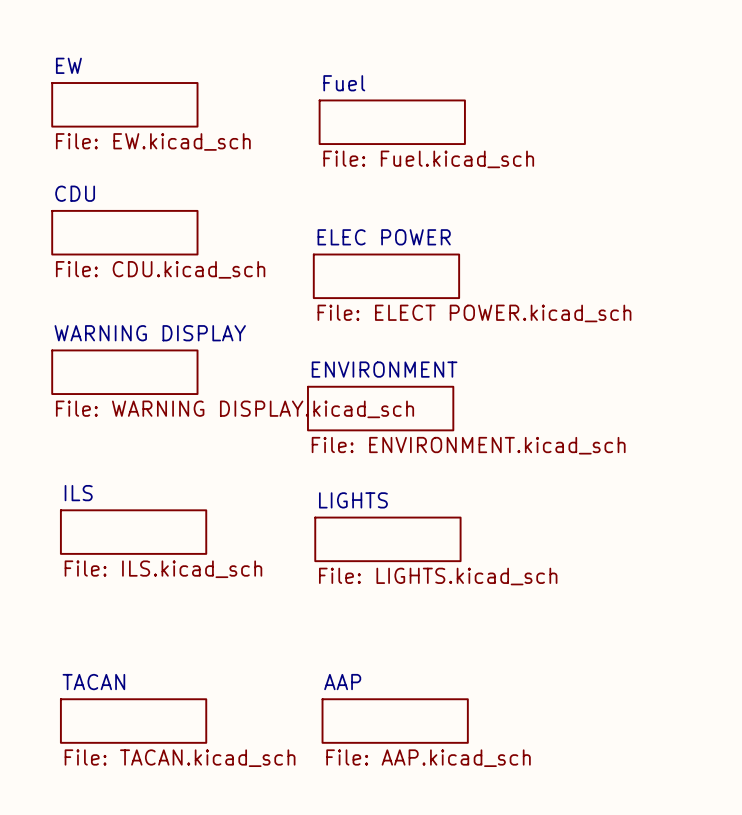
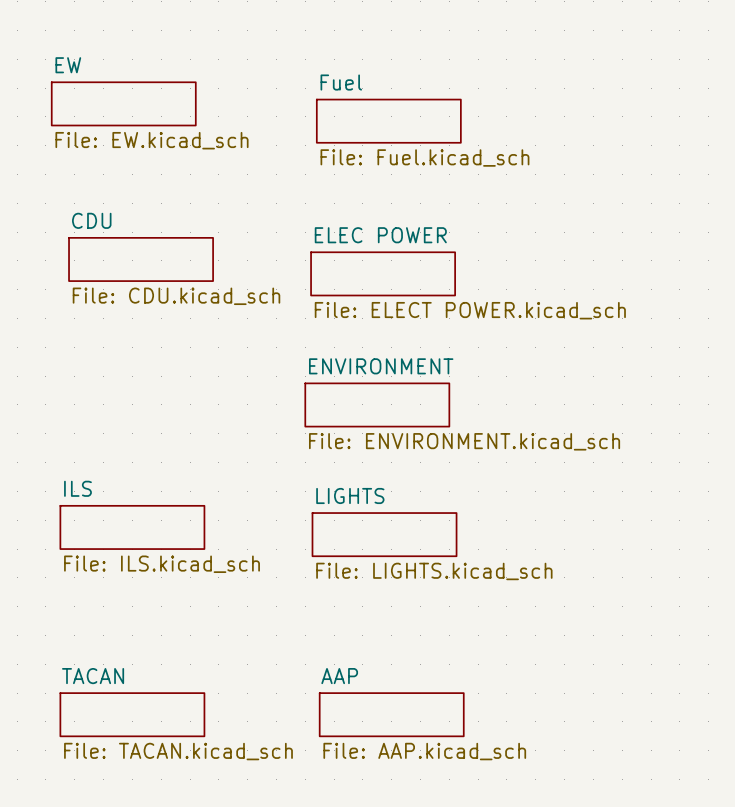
sheet CDU position: (124, 232) -> (141, 259)
sheet WARNING DISPLAY: File: WARNING DISPLAY.kicad_sch (124, 372) -> none

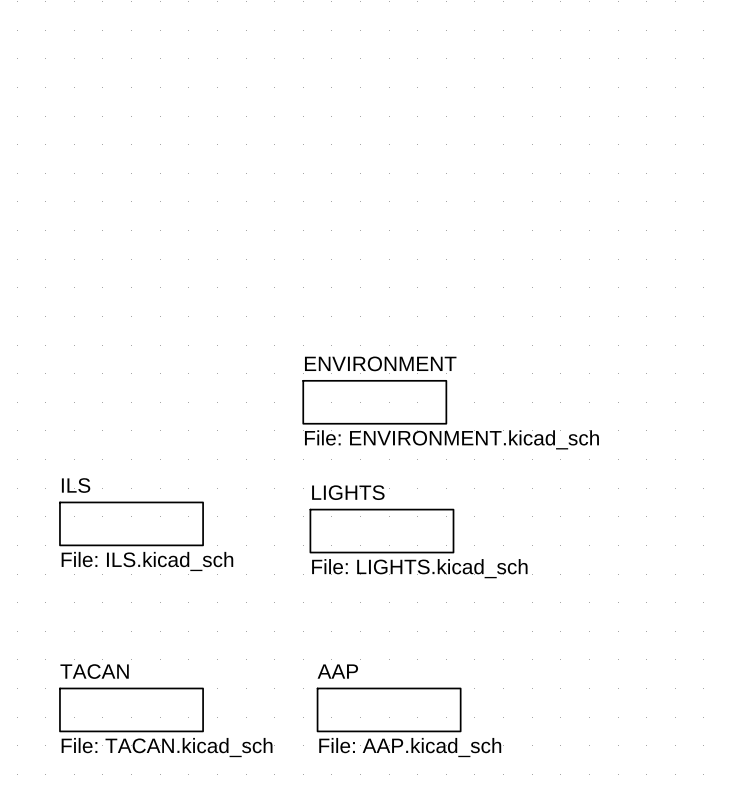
sheet EW: File: EW.kicad_sch (123, 103) -> none
sheet Fuel: File: Fuel.kicad_sch (388, 121) -> none
sheet CDU: File: CDU.kicad_sch (141, 259) -> none
sheet ELEC POWER: File: ELECT POWER.kicad_sch (383, 273) -> none

